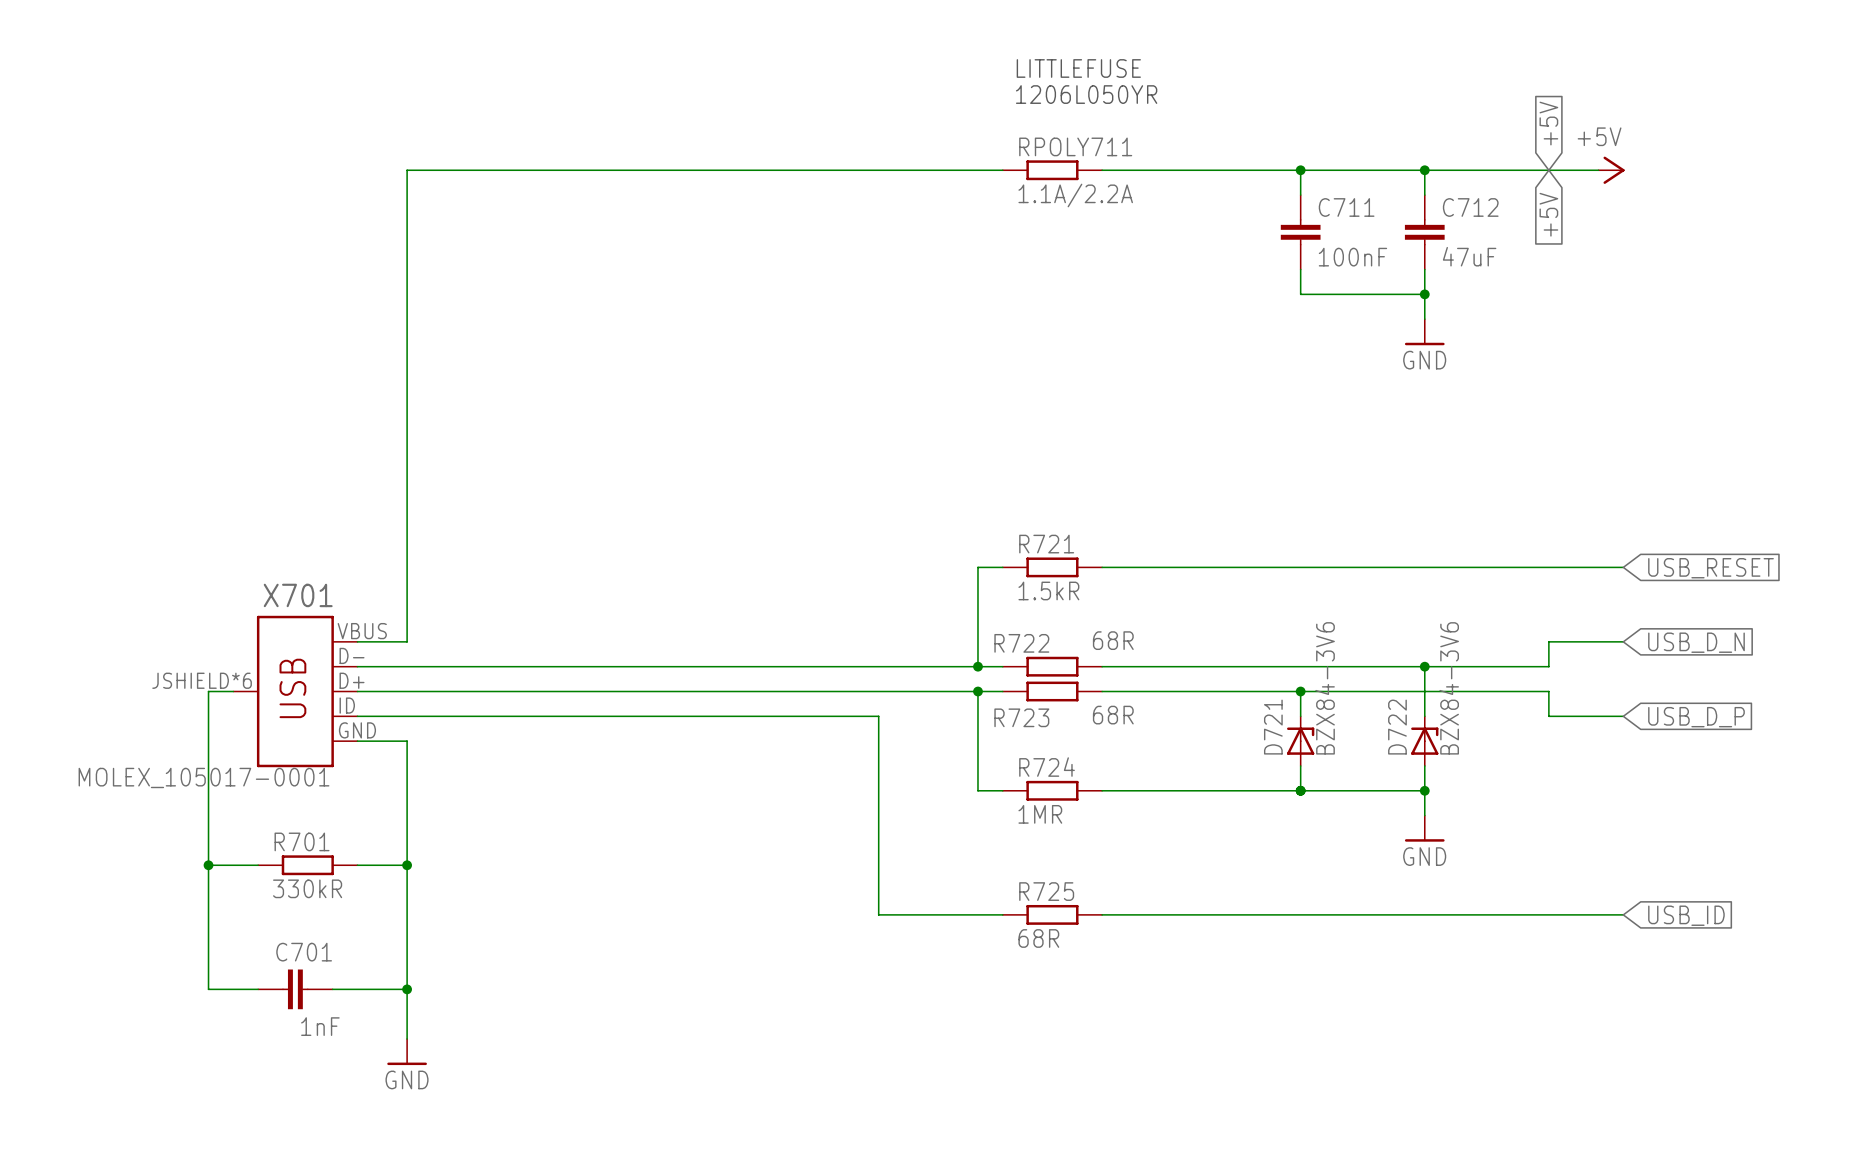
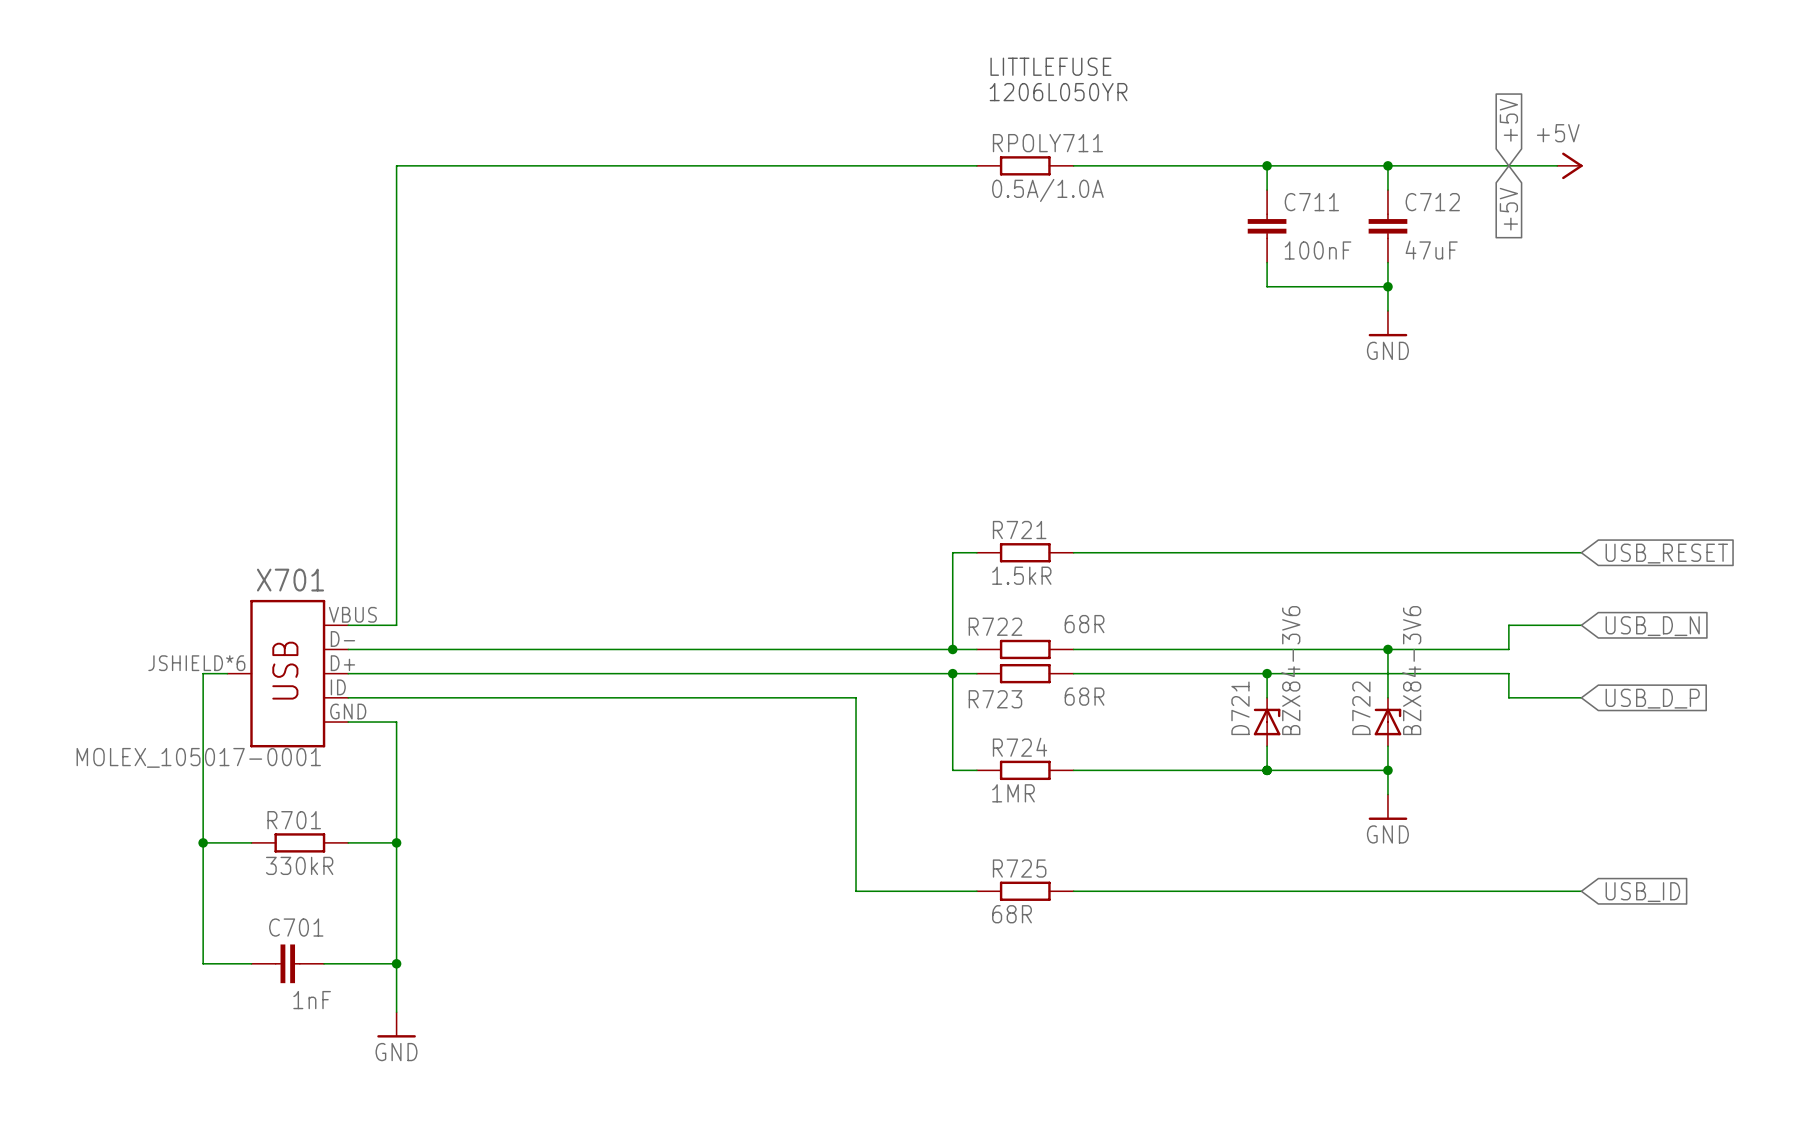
RPOLY711 value: 1.1A/2.2A (1075, 195) -> 0.5A/1.0A (1047, 190)

